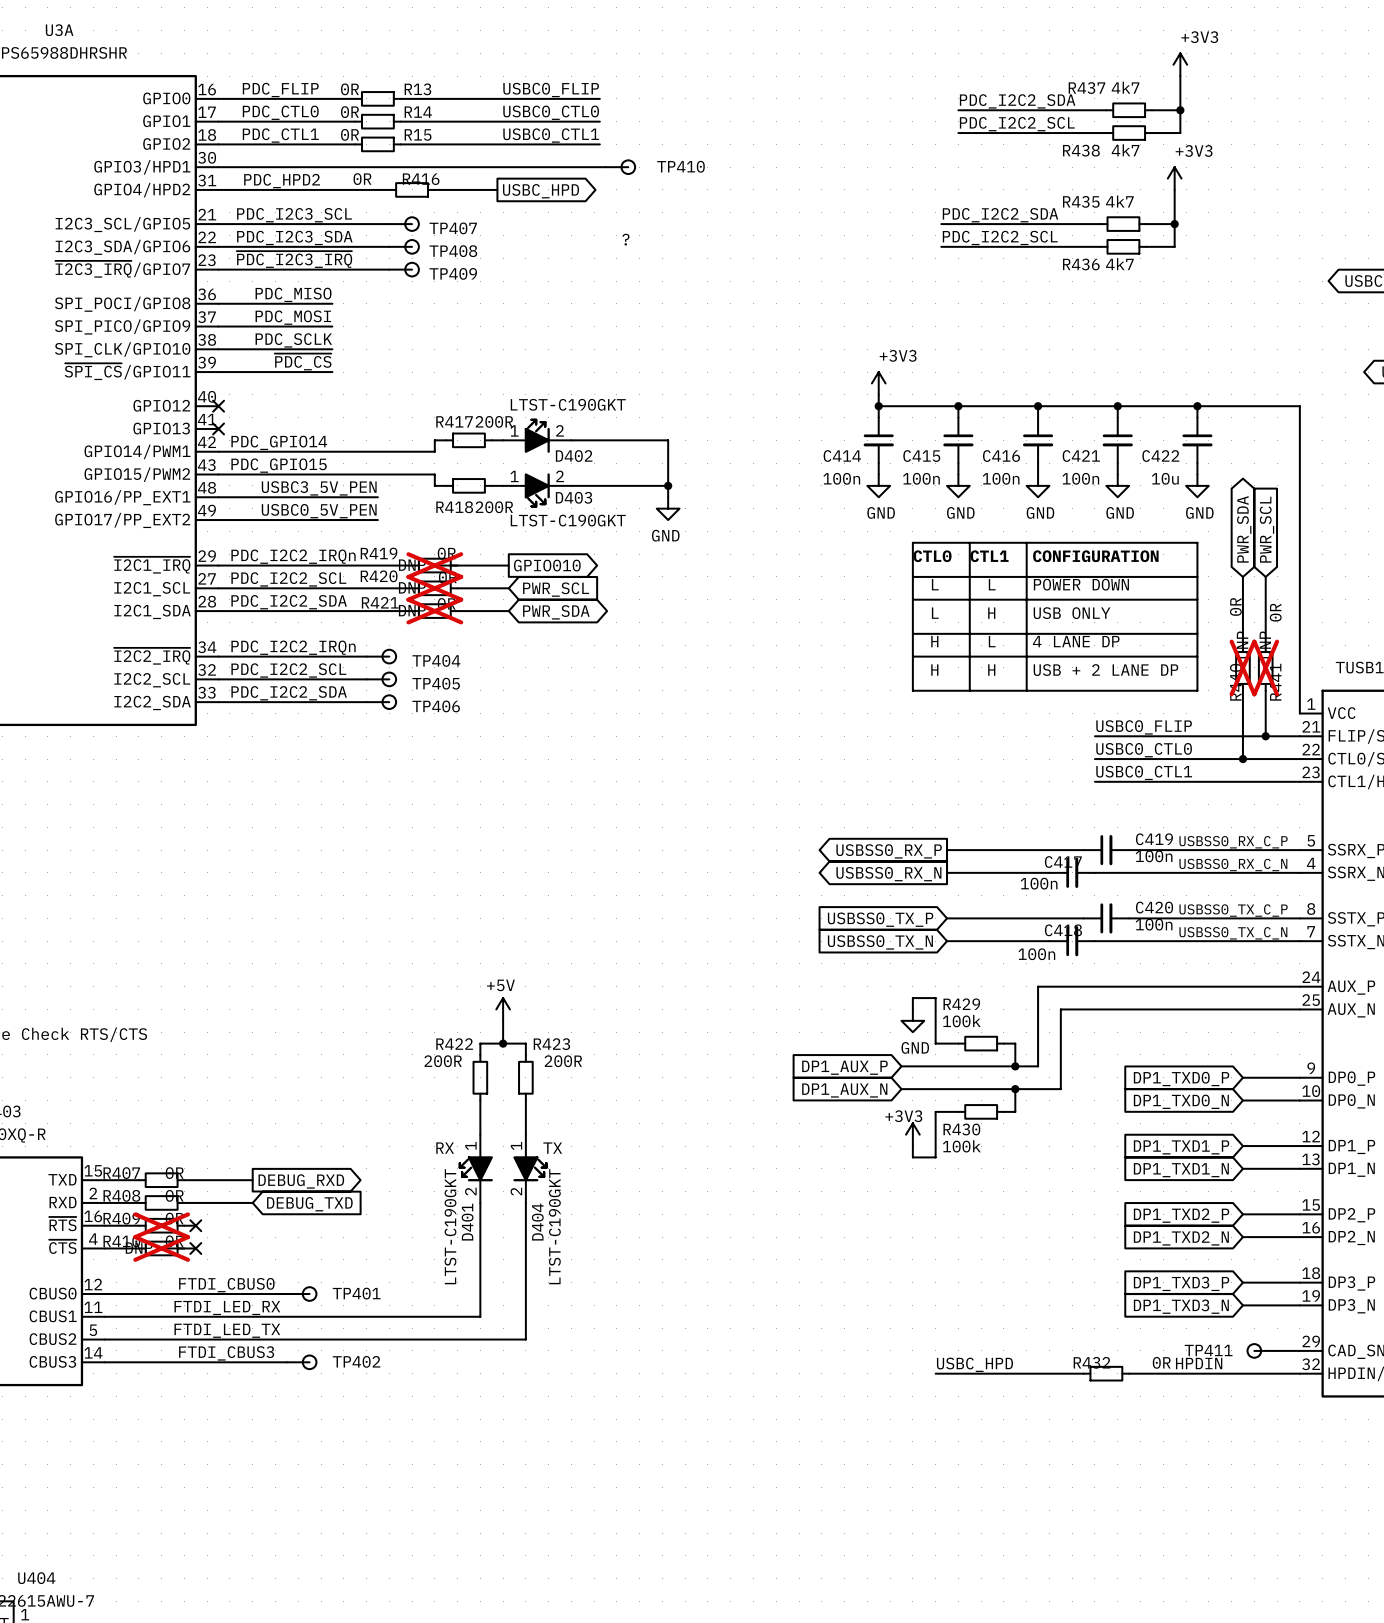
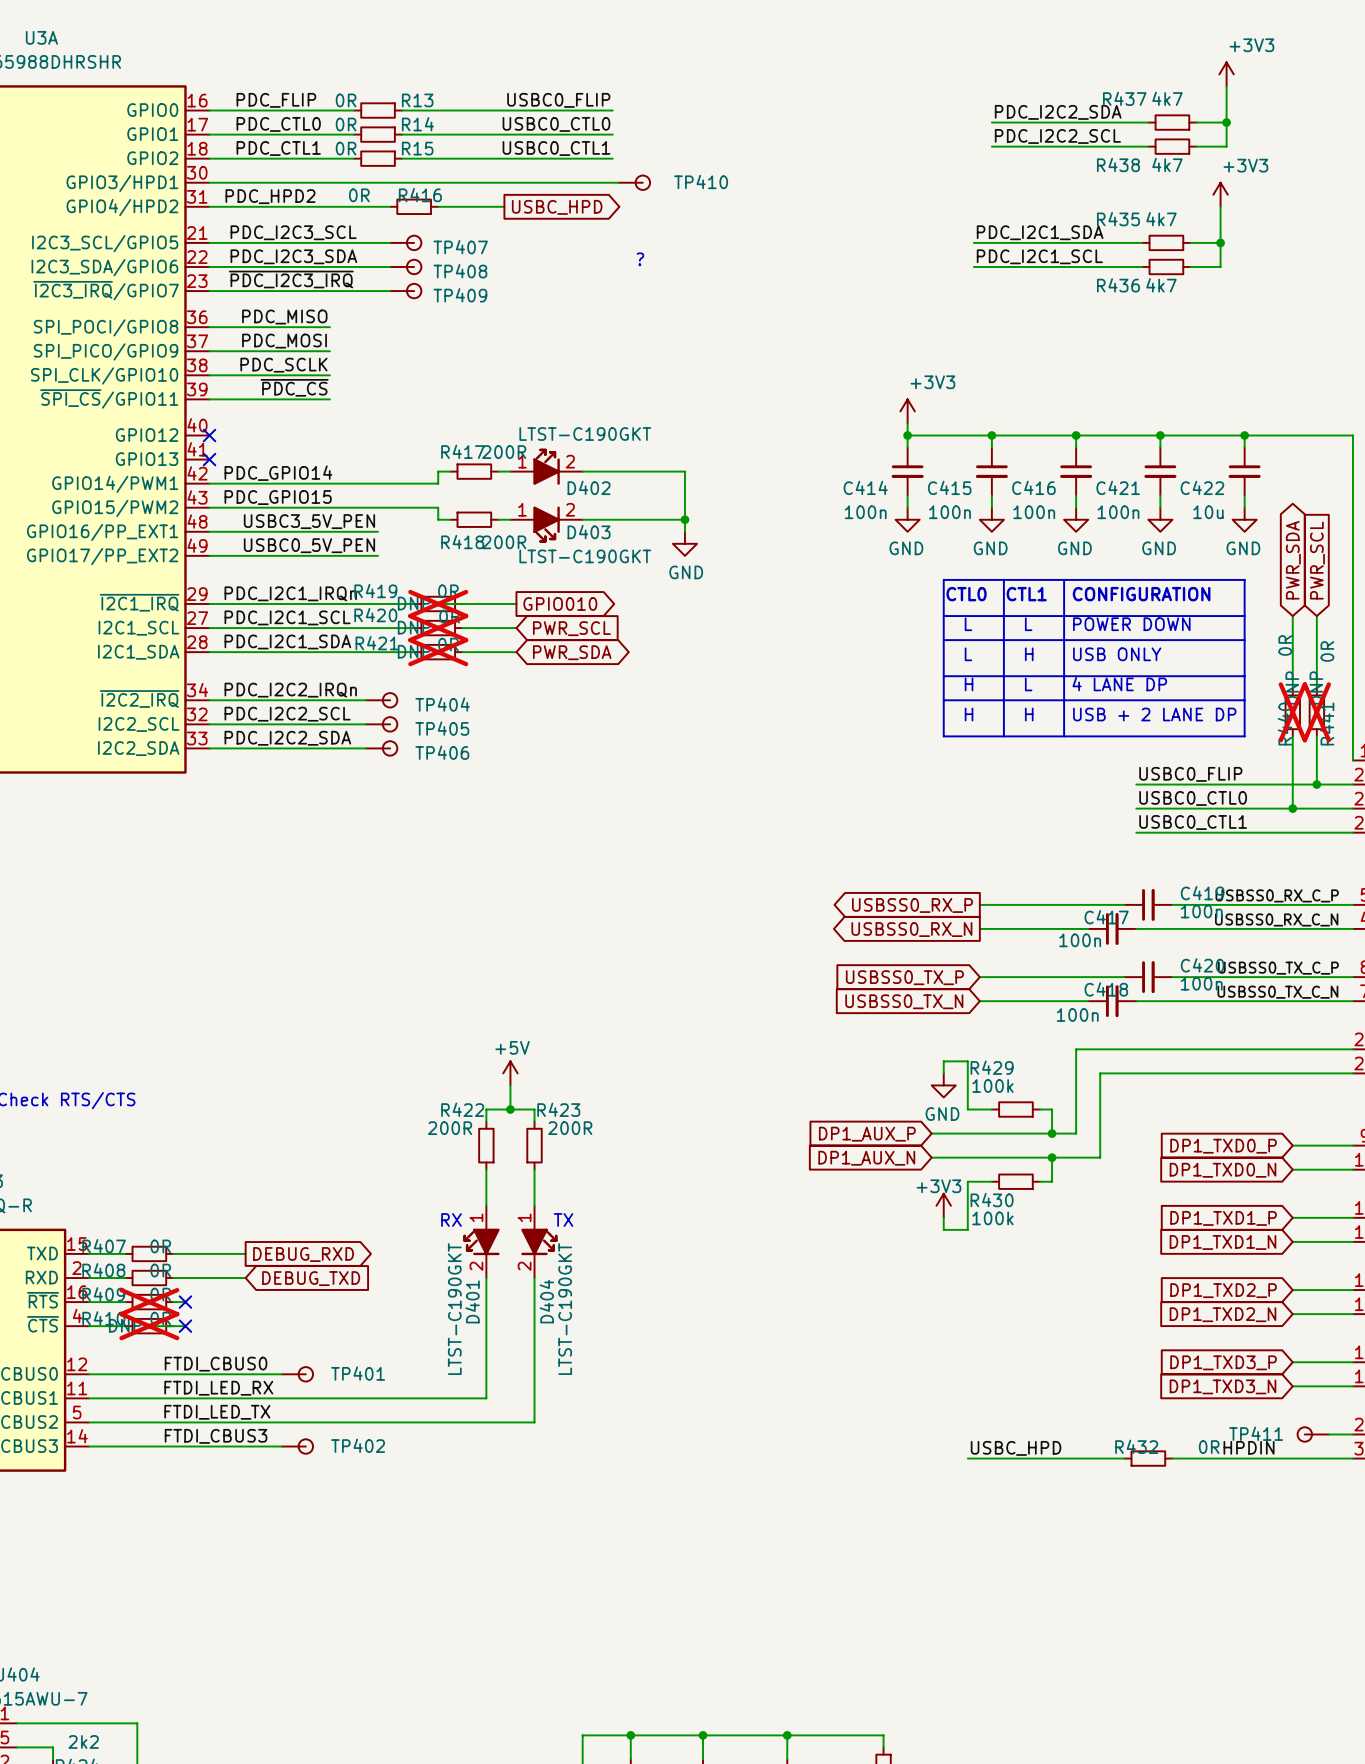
label: PDC_I2C2_SDA (1000, 215) -> PDC_I2C1_SDA (1040, 232)
label: PDC_I2C2_SCL (1000, 237) -> PDC_I2C1_SCL (1039, 256)
label: PDC_I2C2_IRQn (293, 556) -> PDC_I2C1_IRQn (290, 593)
label: PDC_I2C2_SCL (288, 579) -> PDC_I2C1_SCL (287, 617)
label: PDC_I2C2_SDA (289, 602) -> PDC_I2C1_SDA (287, 641)

